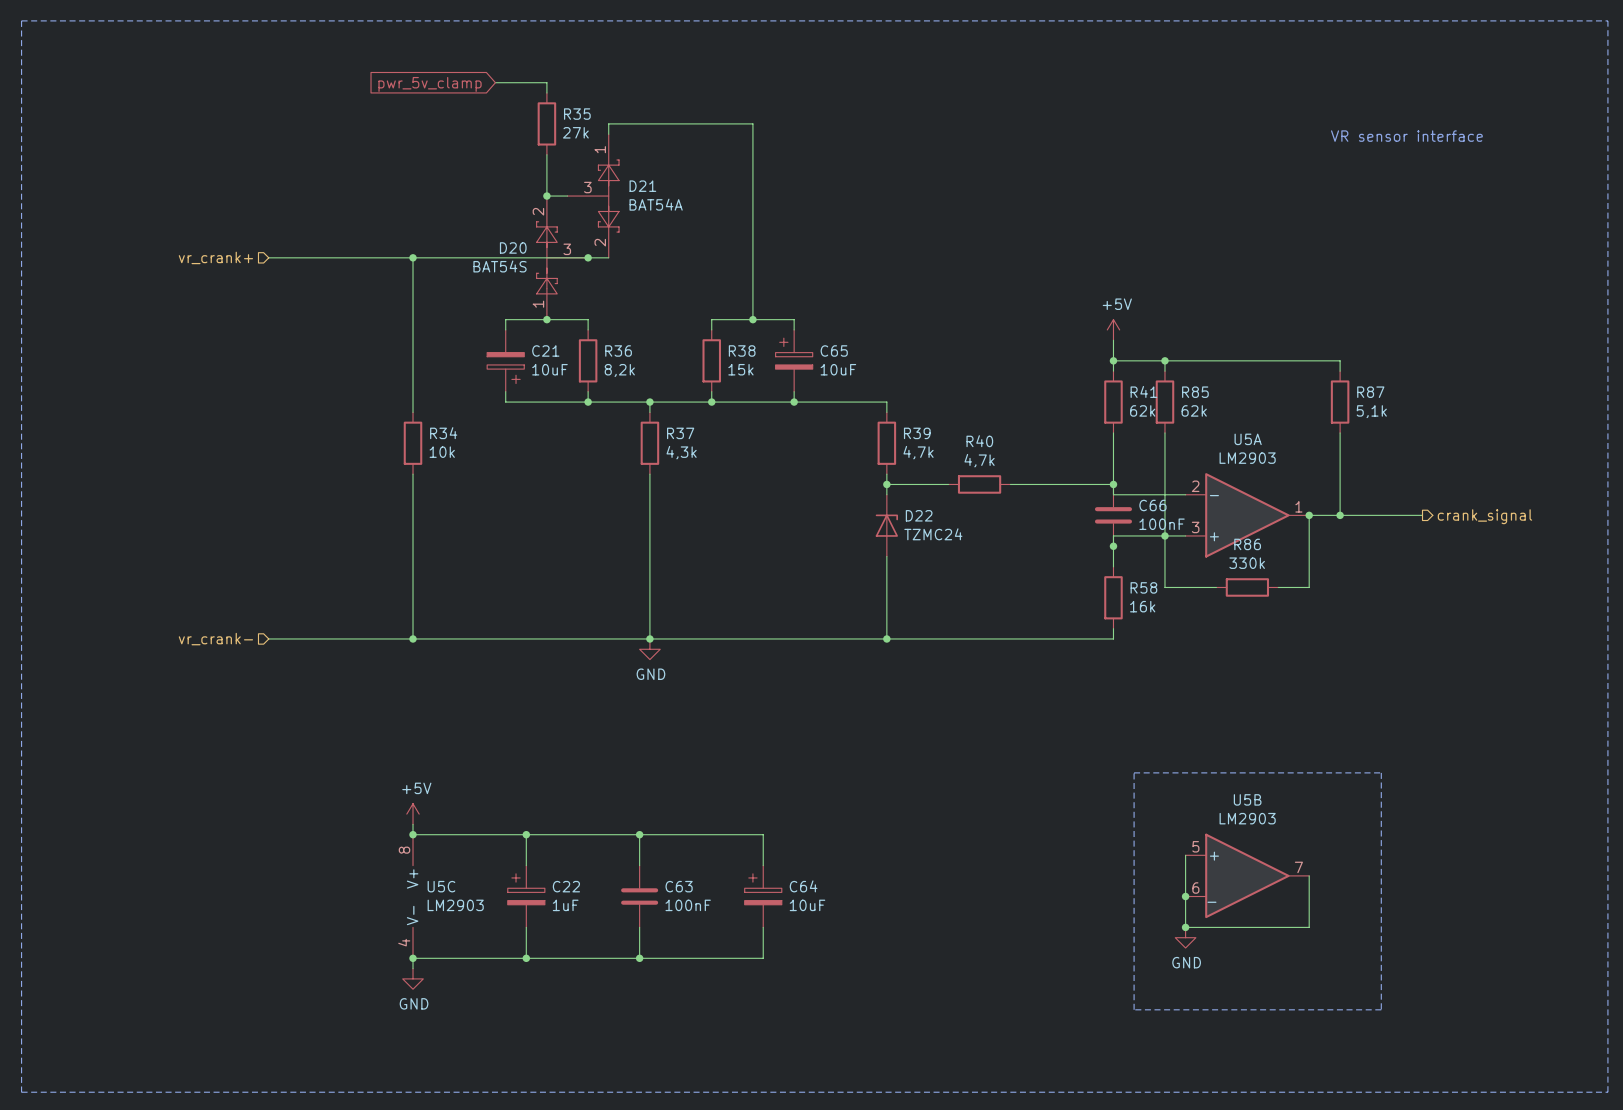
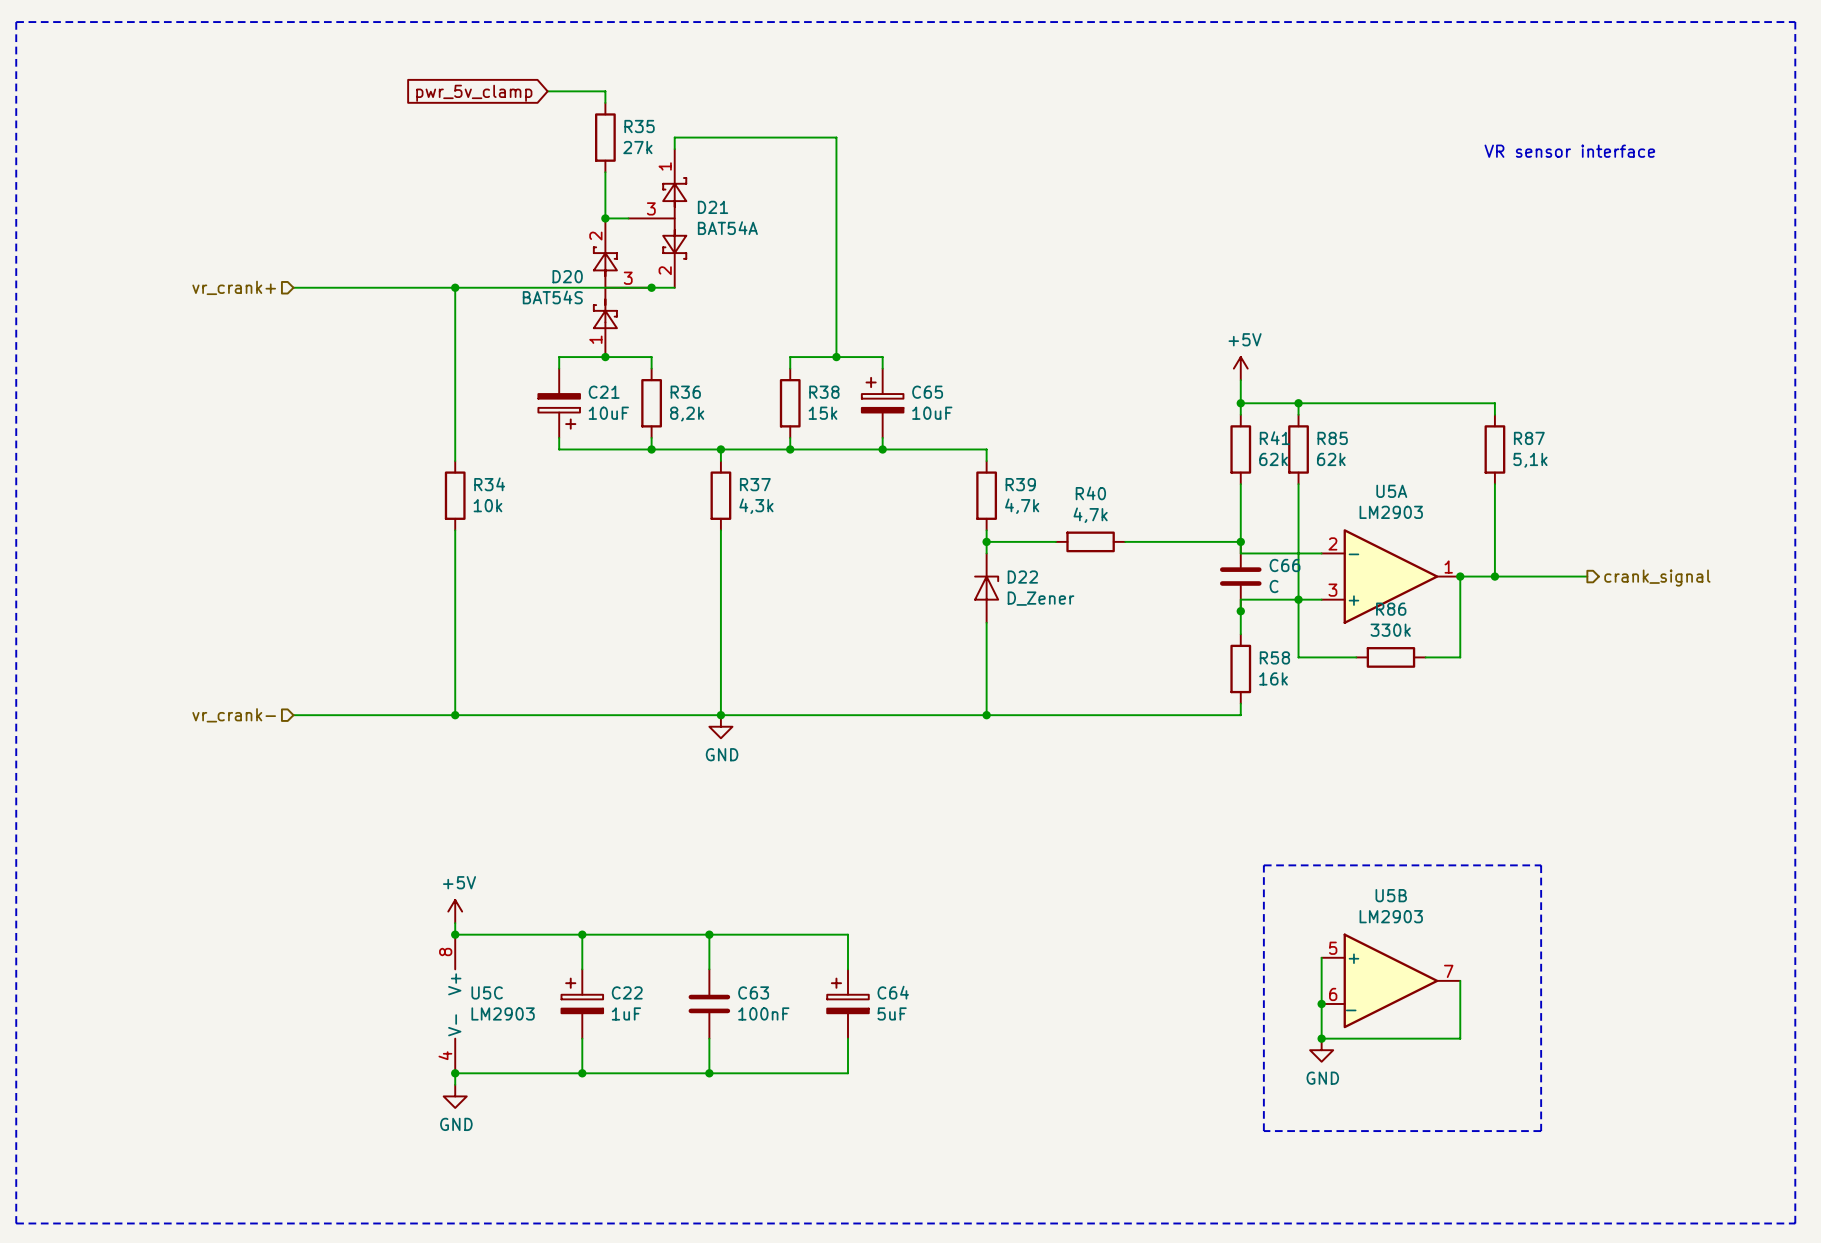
C66 value: 100nF (1162, 524) -> C (1274, 586)
D22 value: TZMC24 (933, 534) -> D_Zener (1041, 598)
C64 value: 10uF (807, 905) -> 5uF (892, 1013)

